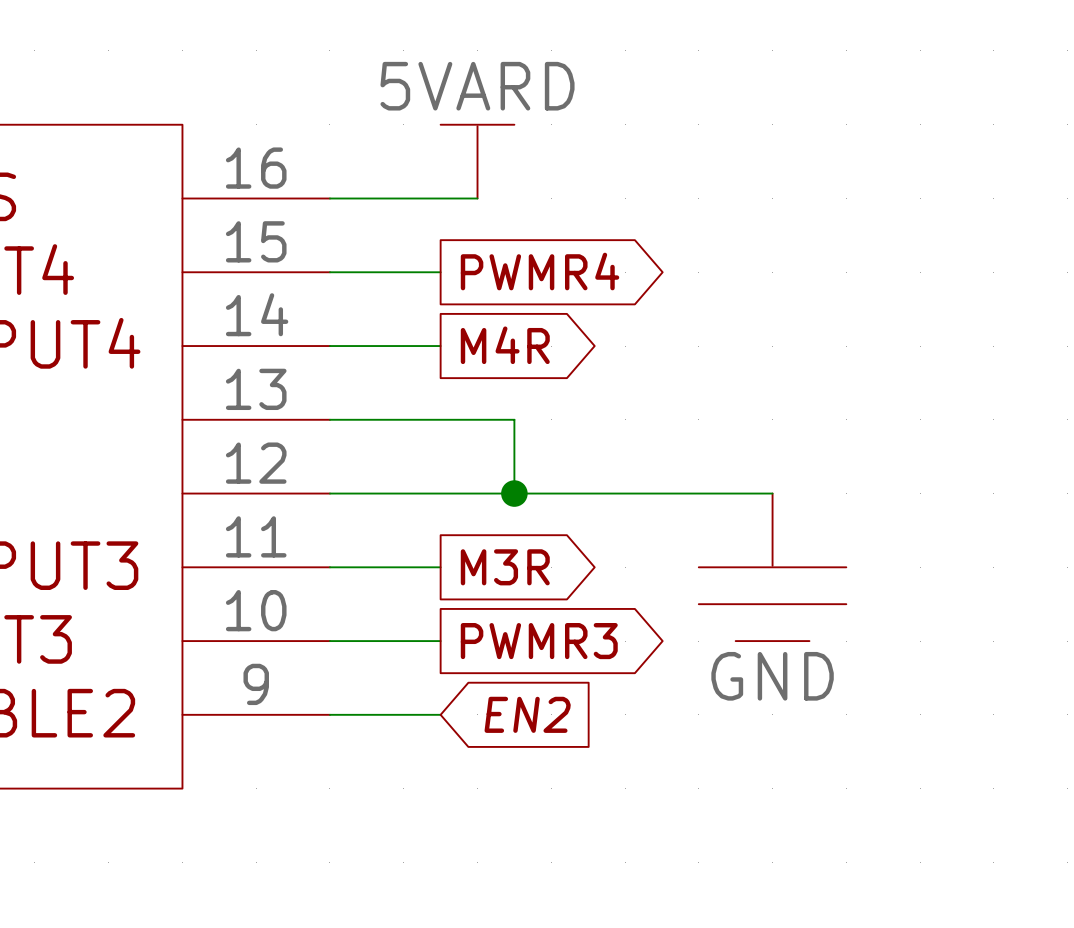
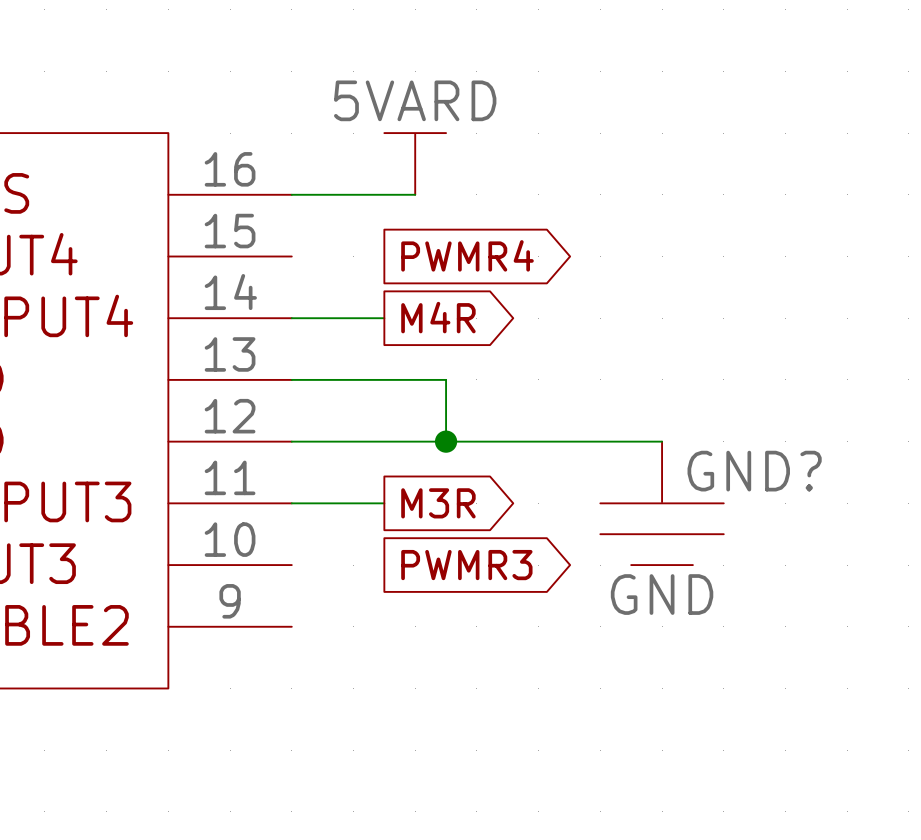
wire: (329, 272) (440, 272) -> none
GND? name: none -> GND? (754, 471)
wire: (329, 641) (440, 641) -> none
wire: (329, 714) (440, 714) -> none
global label: EN2 (527, 714) -> none

